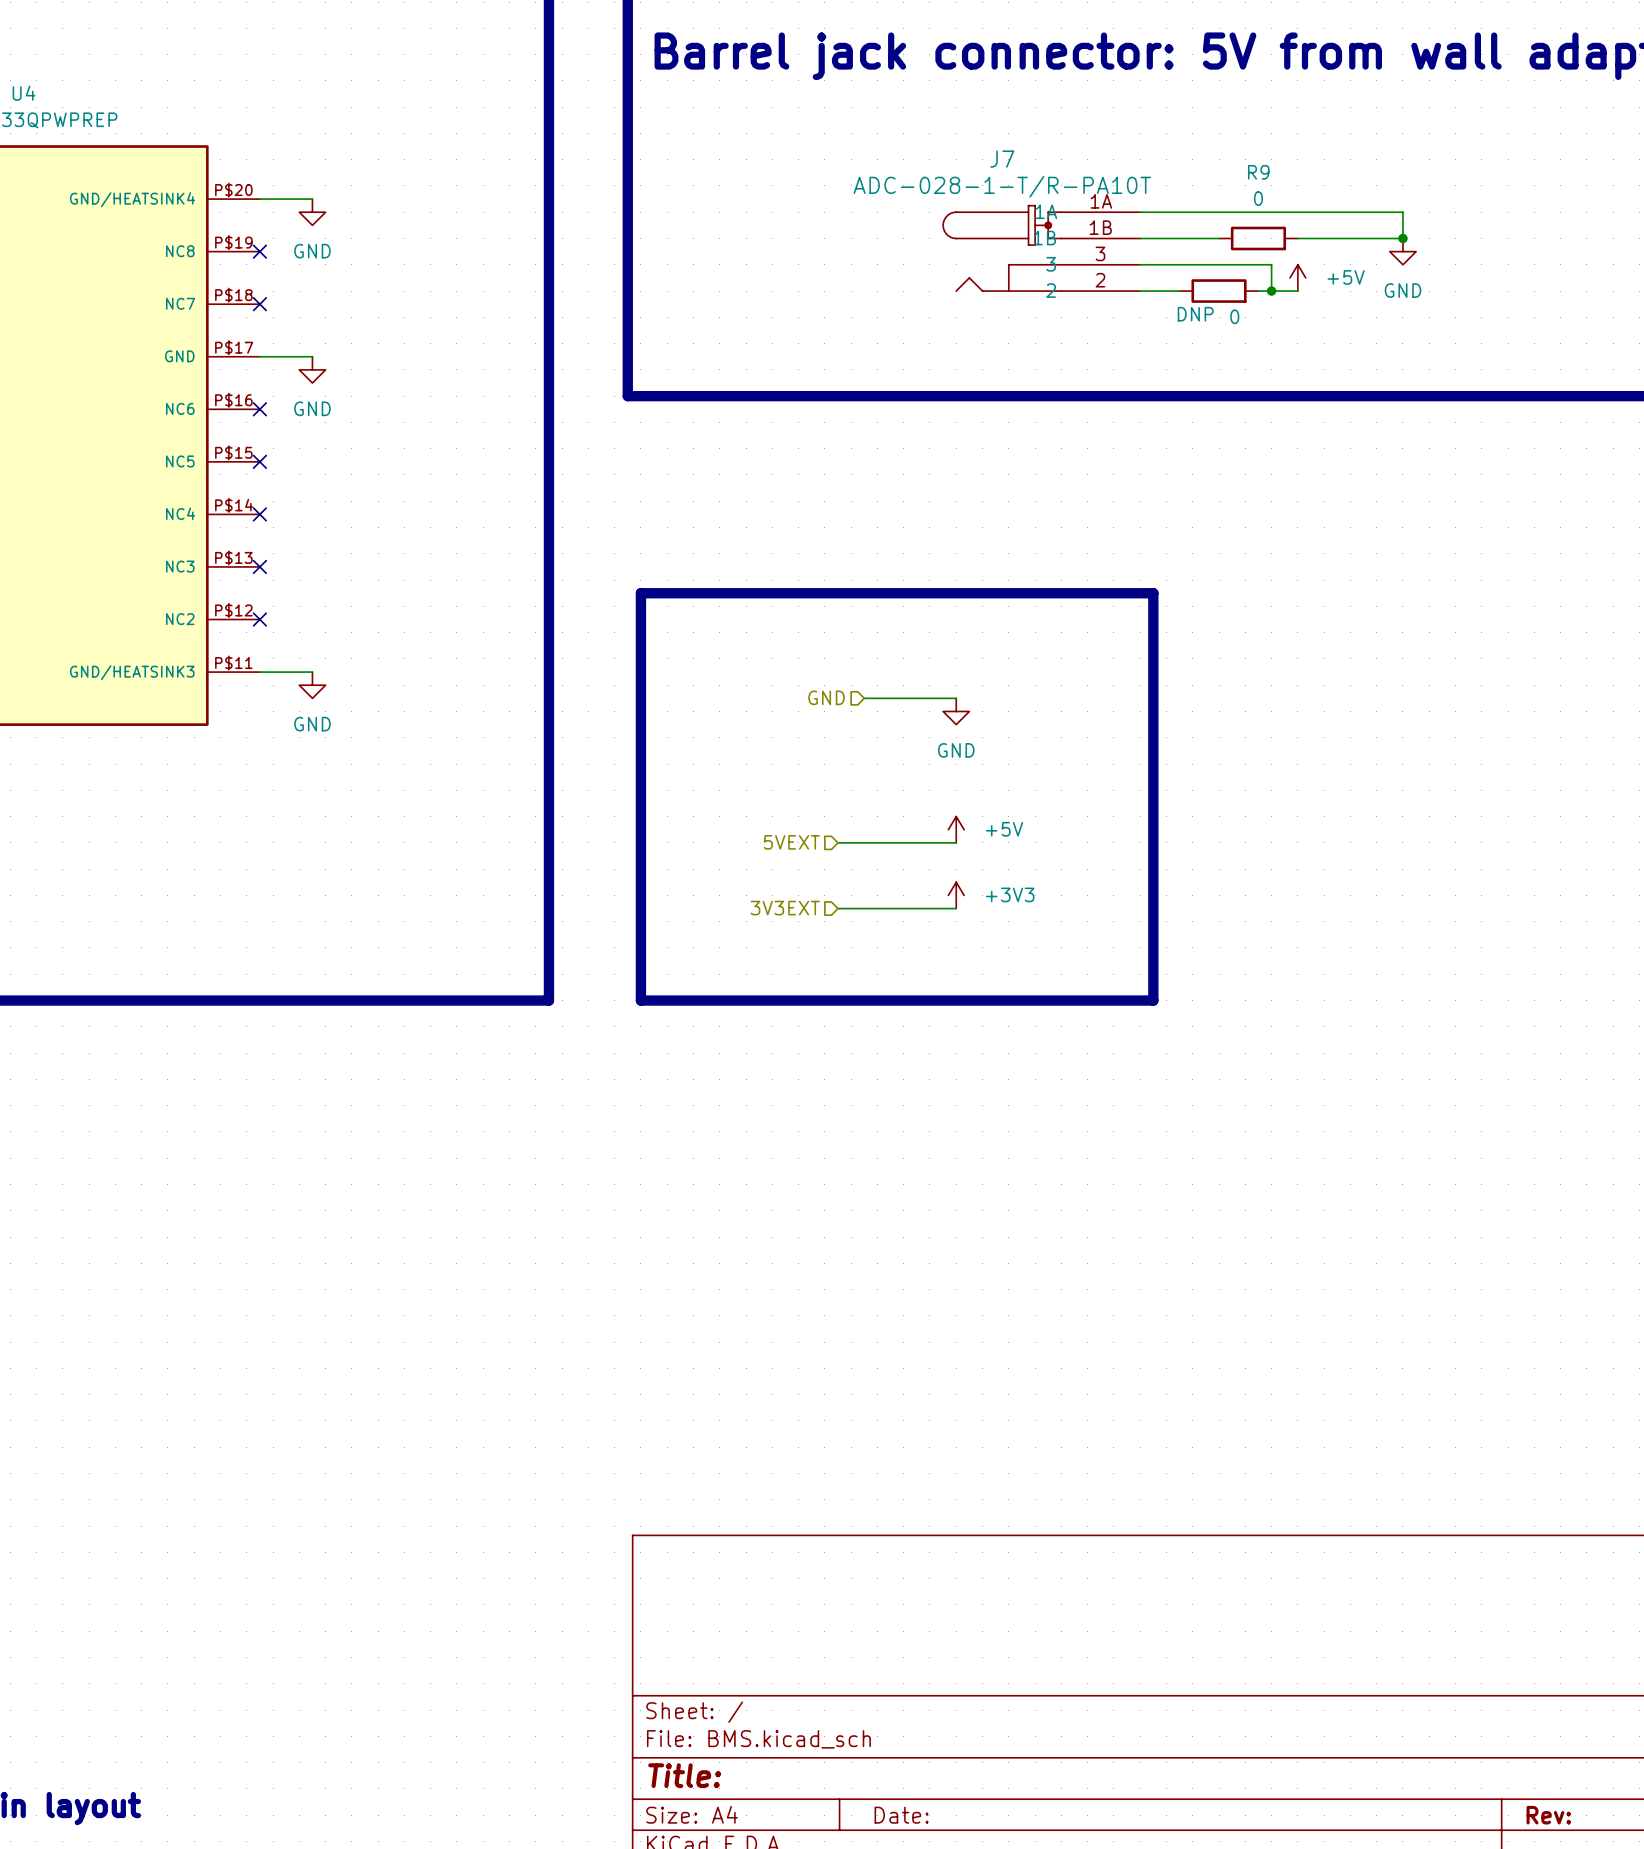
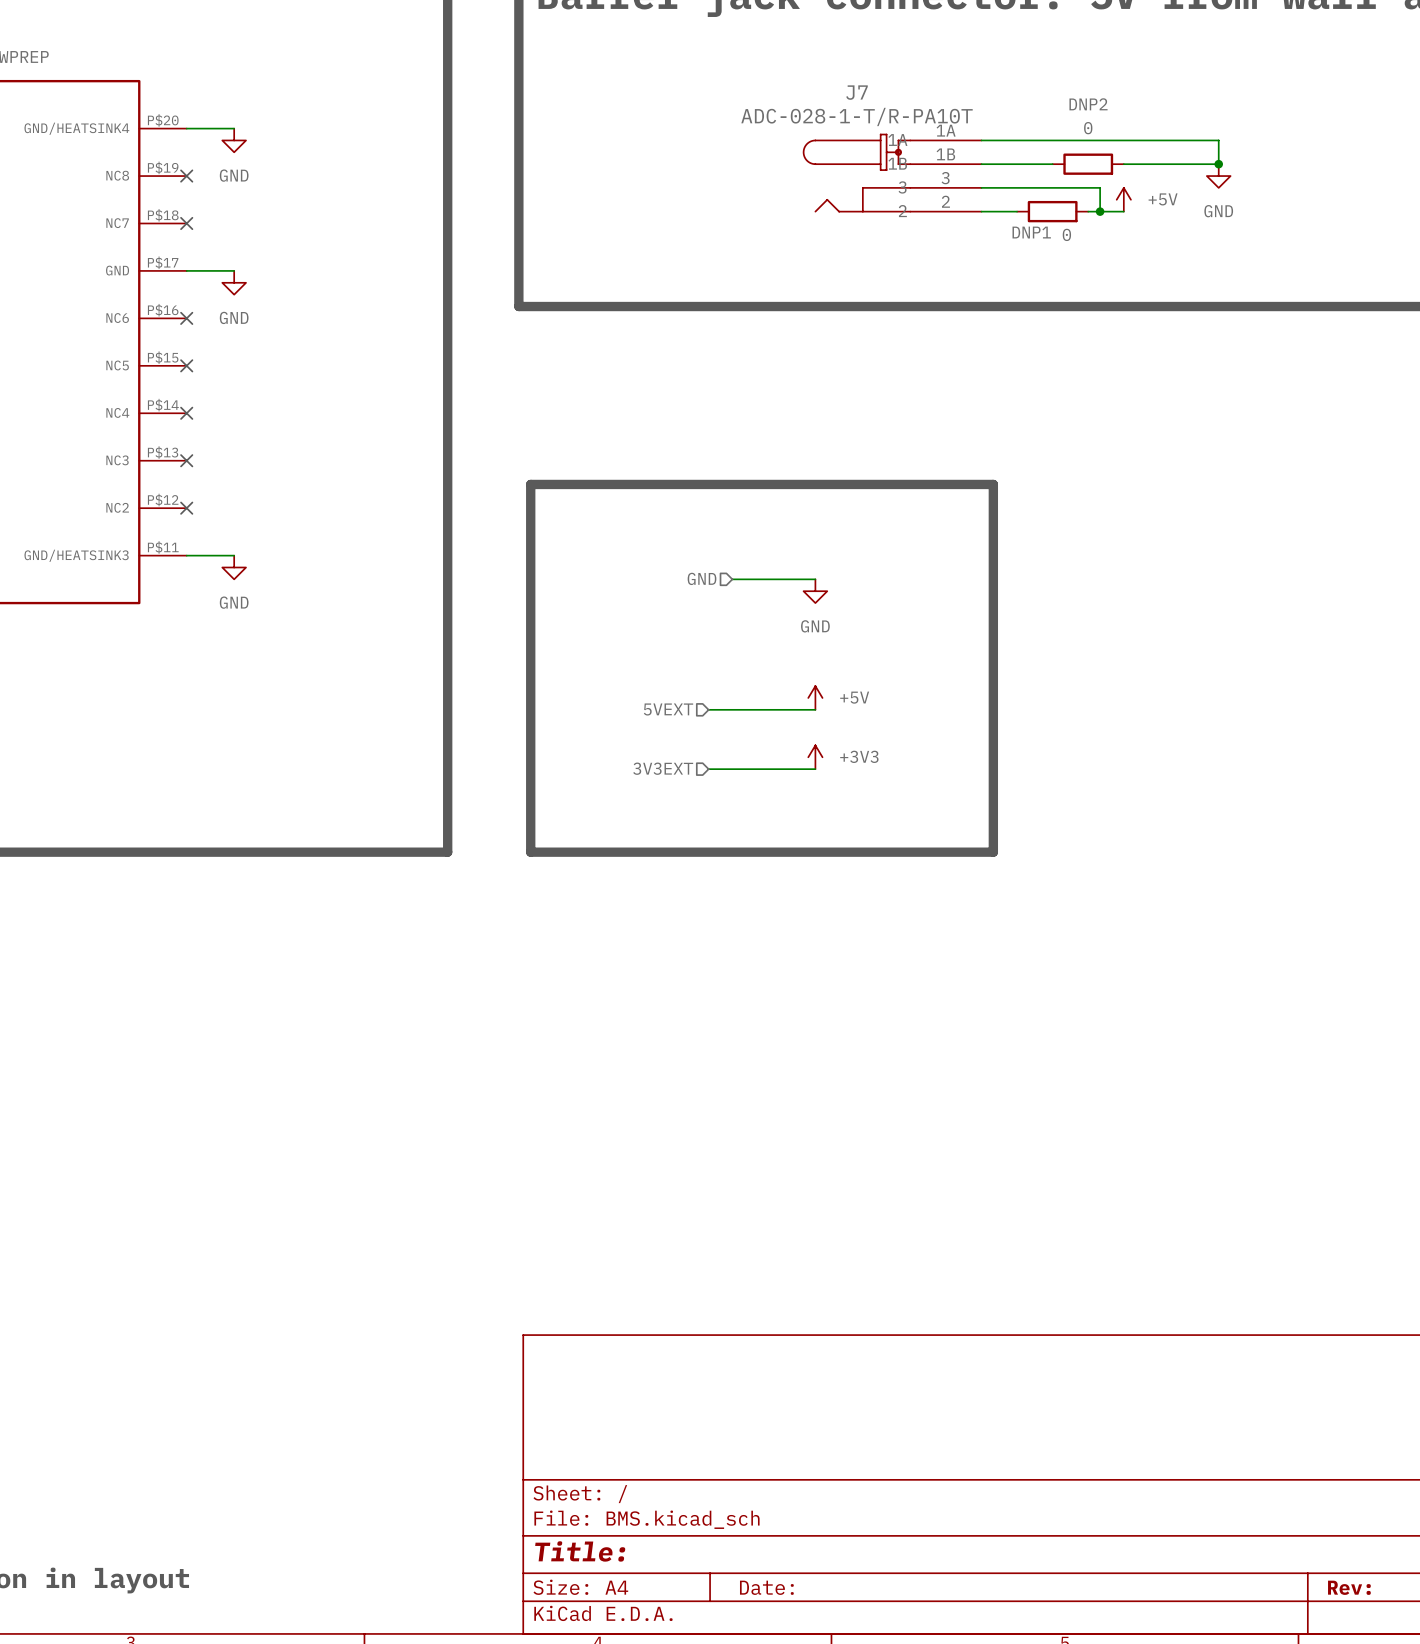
R9 name: R9 (1258, 172) -> DNP2 (1088, 104)
DNP name: DNP (1195, 314) -> DNP1 (1031, 232)

